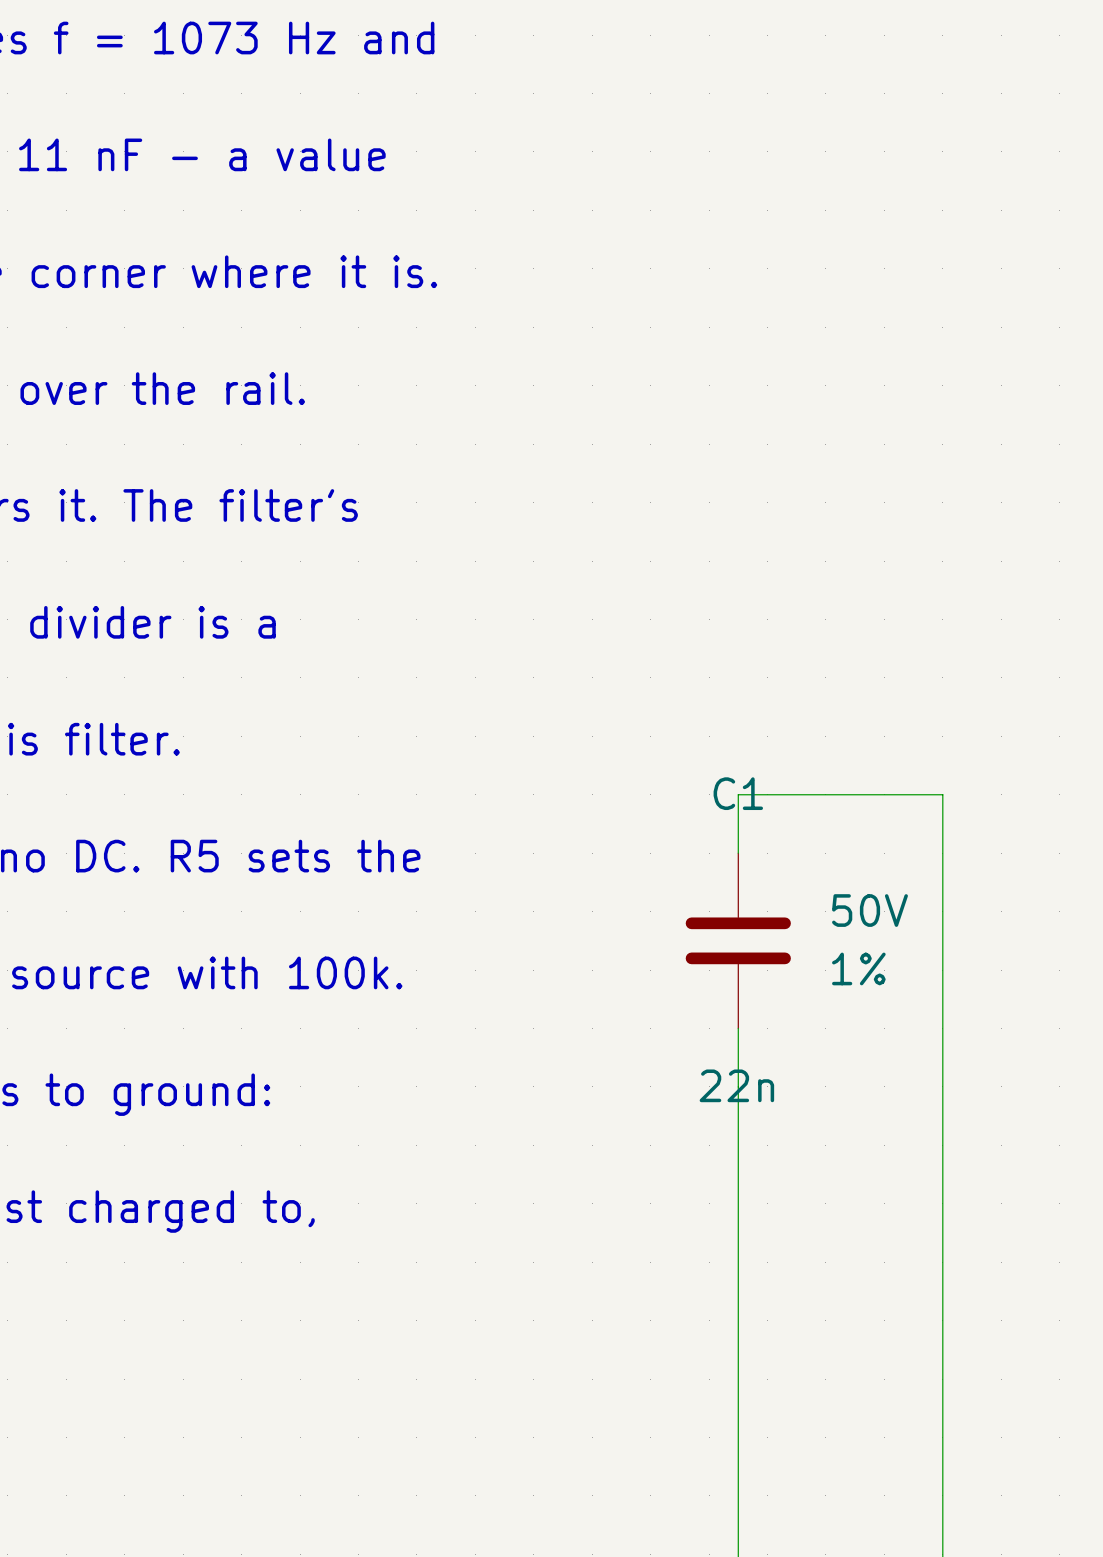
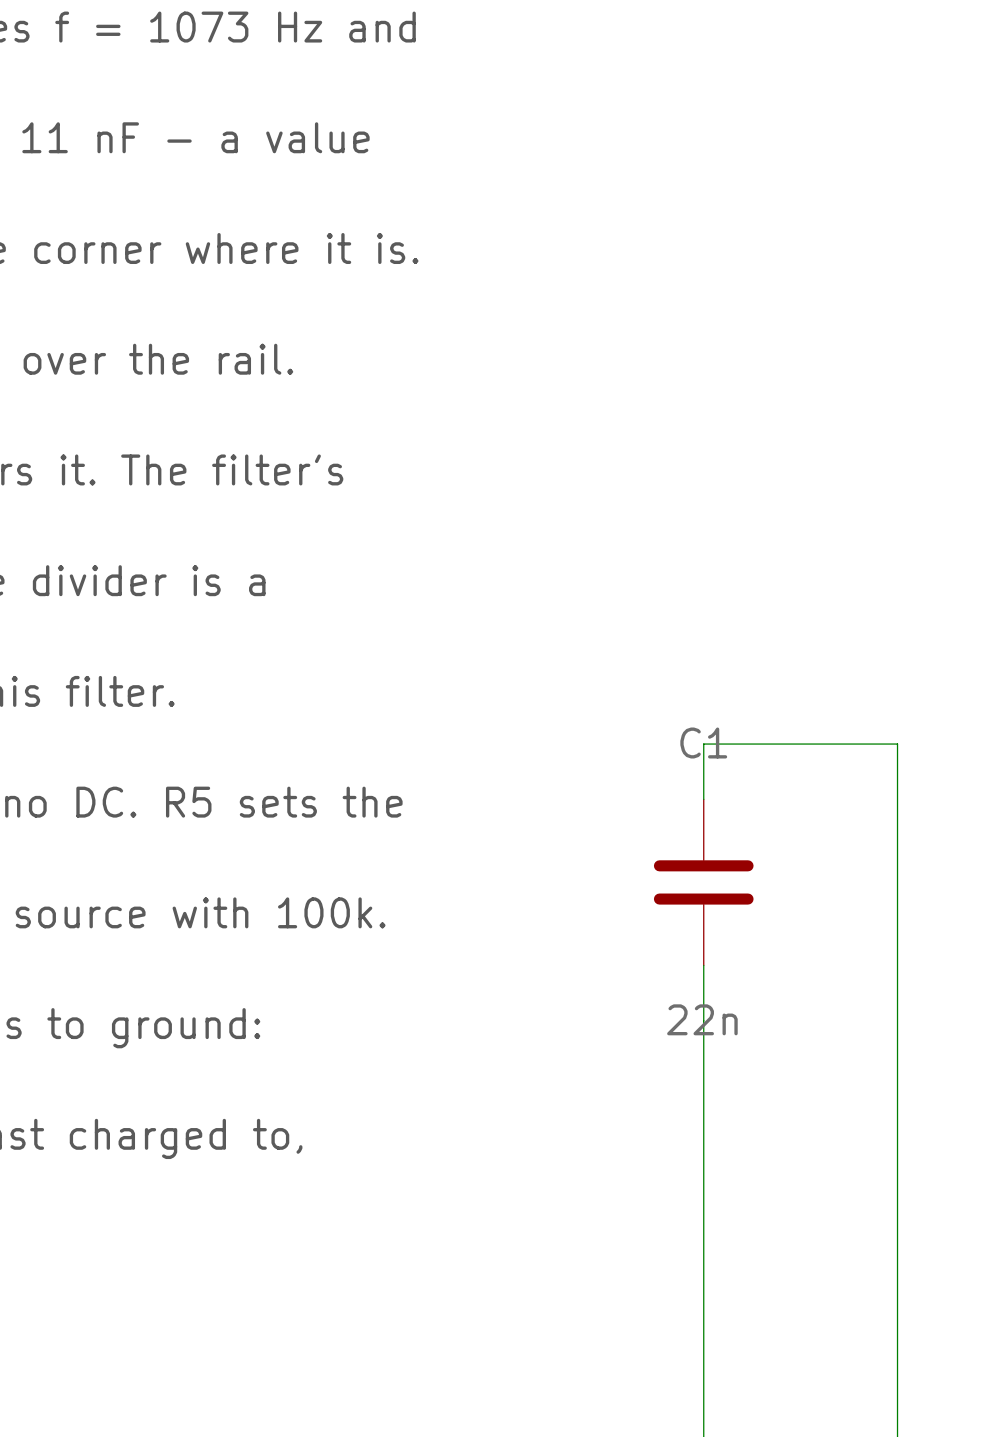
C1 text: 50V (869, 910) -> none
C1 text: 1% (858, 968) -> none

